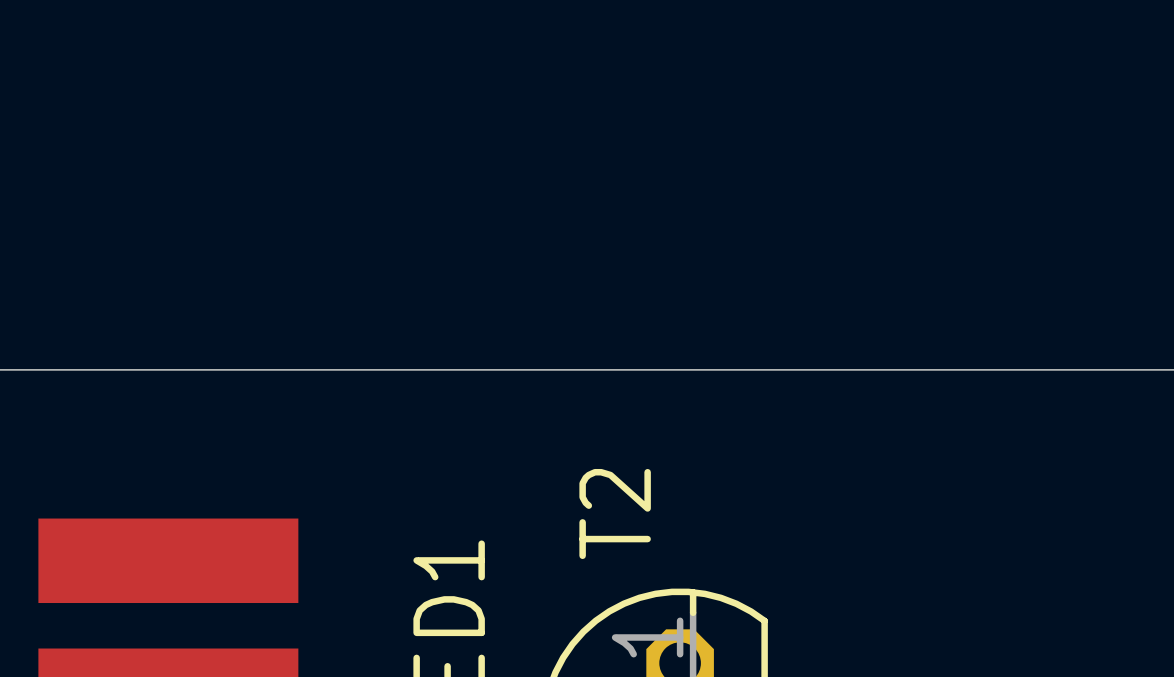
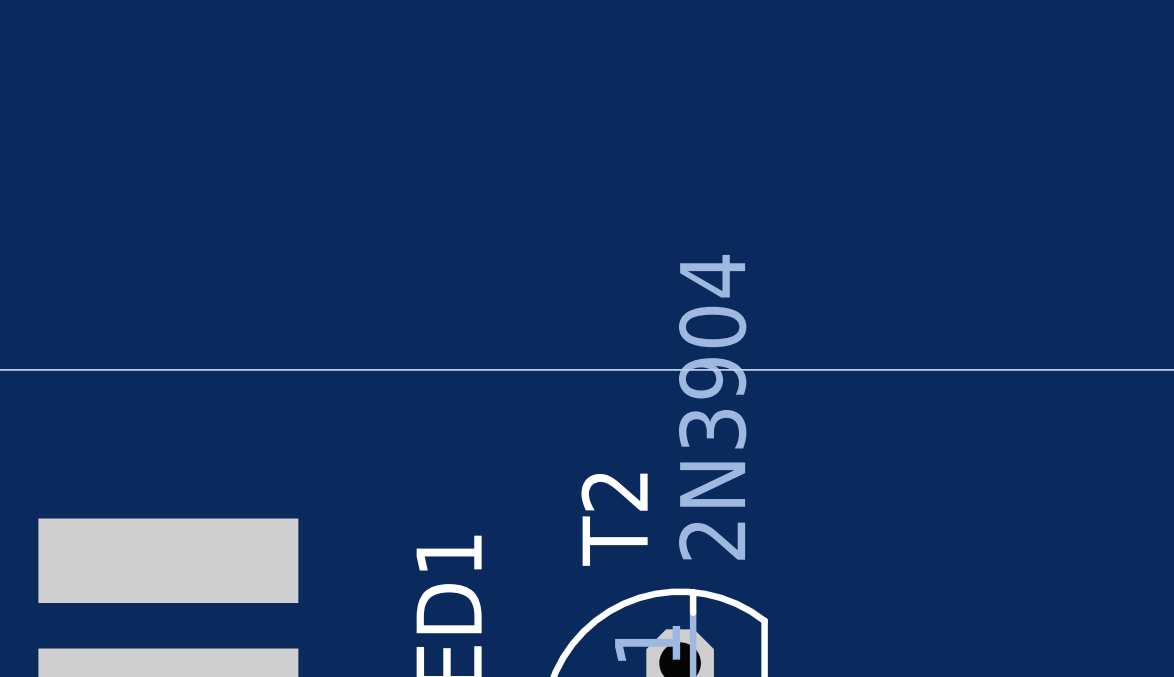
T2 value: none -> 2N3904 (712, 407)

